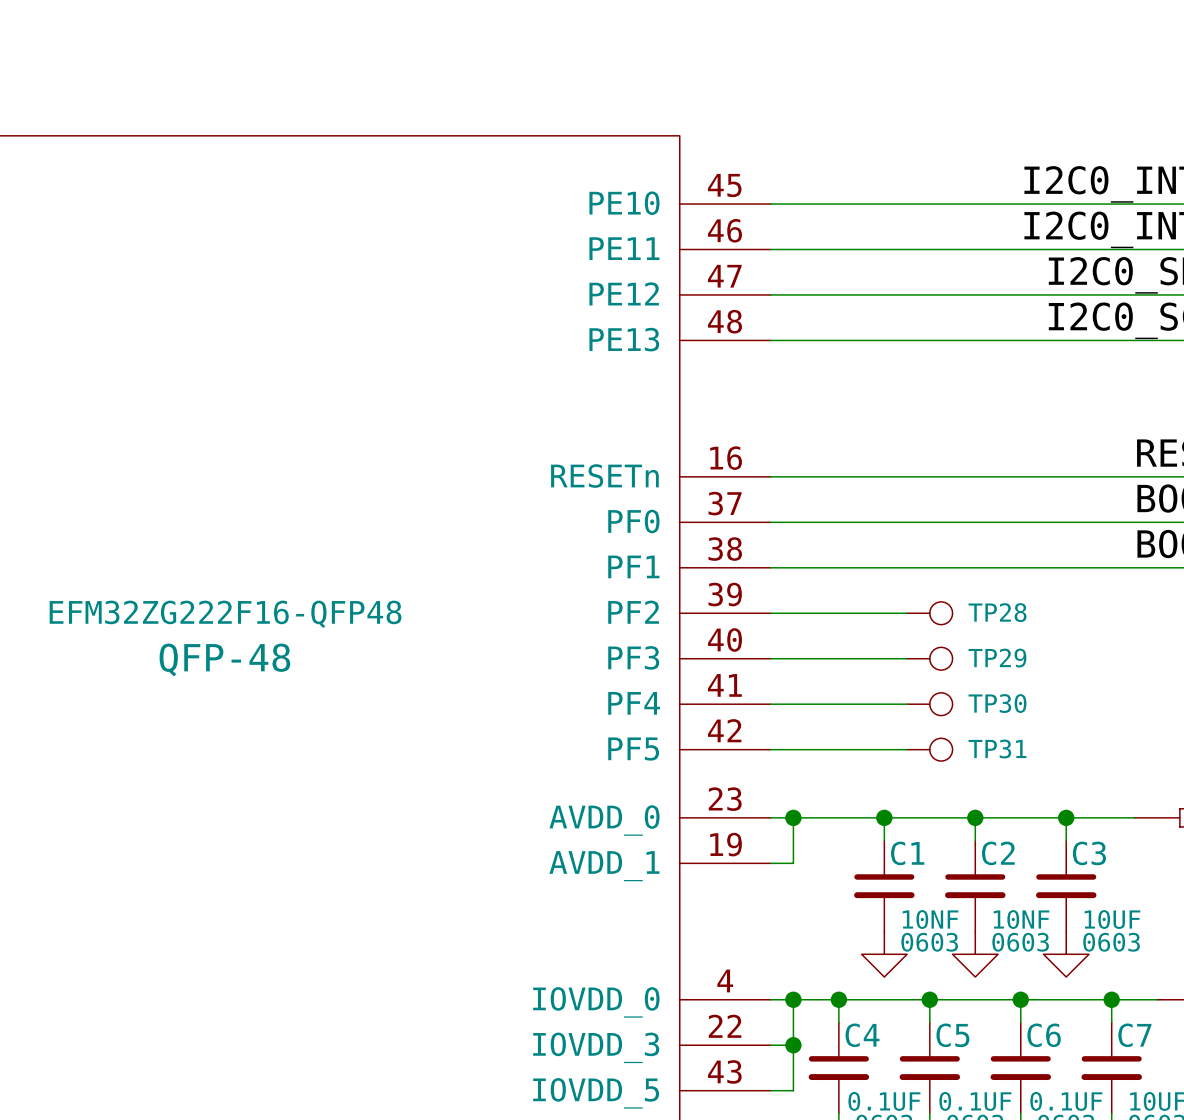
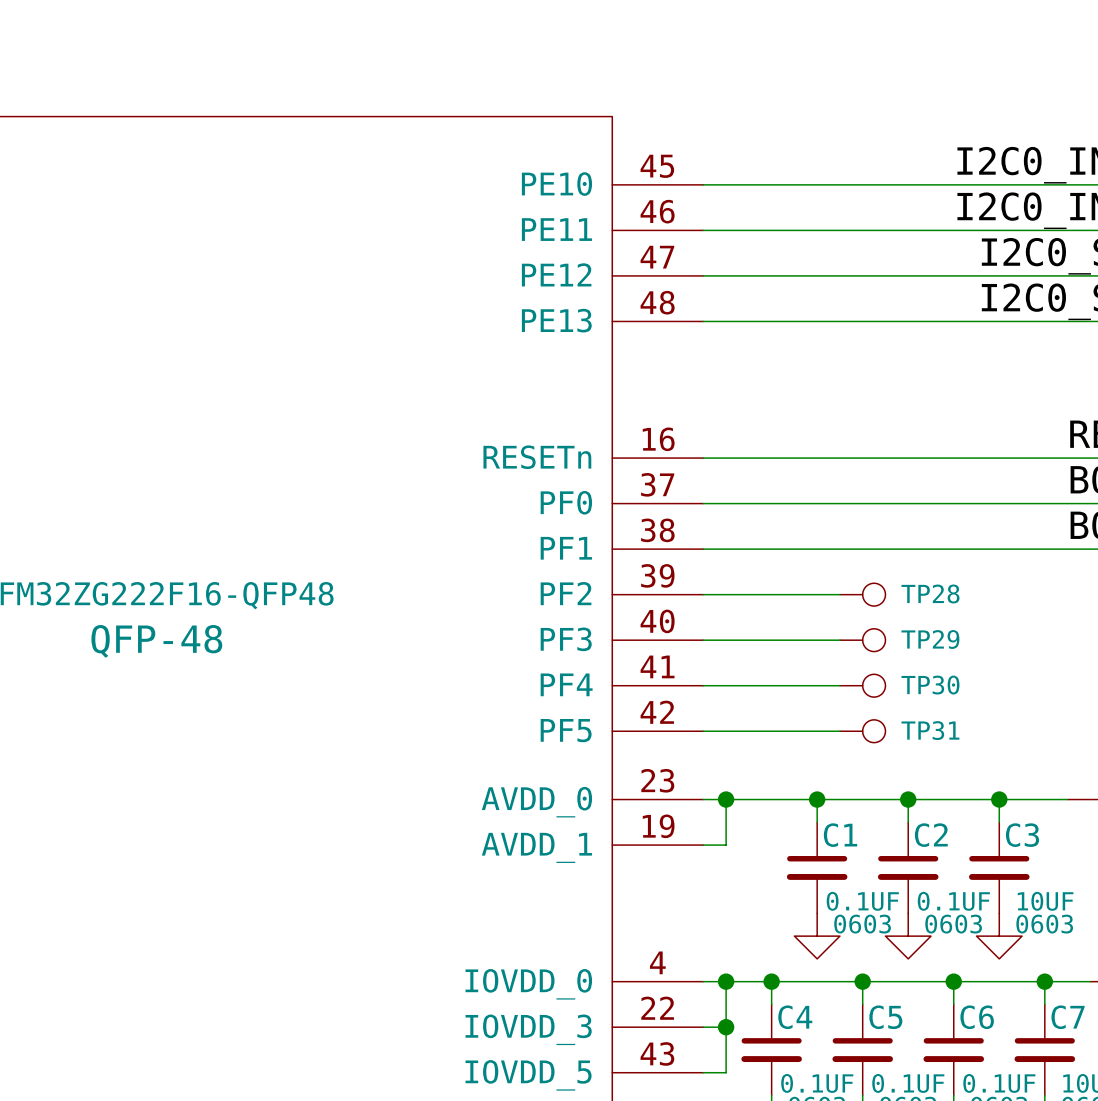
C1 text: 10NF (930, 919) -> 0.1UF (862, 901)
C2 text: 10NF (1021, 919) -> 0.1UF (953, 901)

